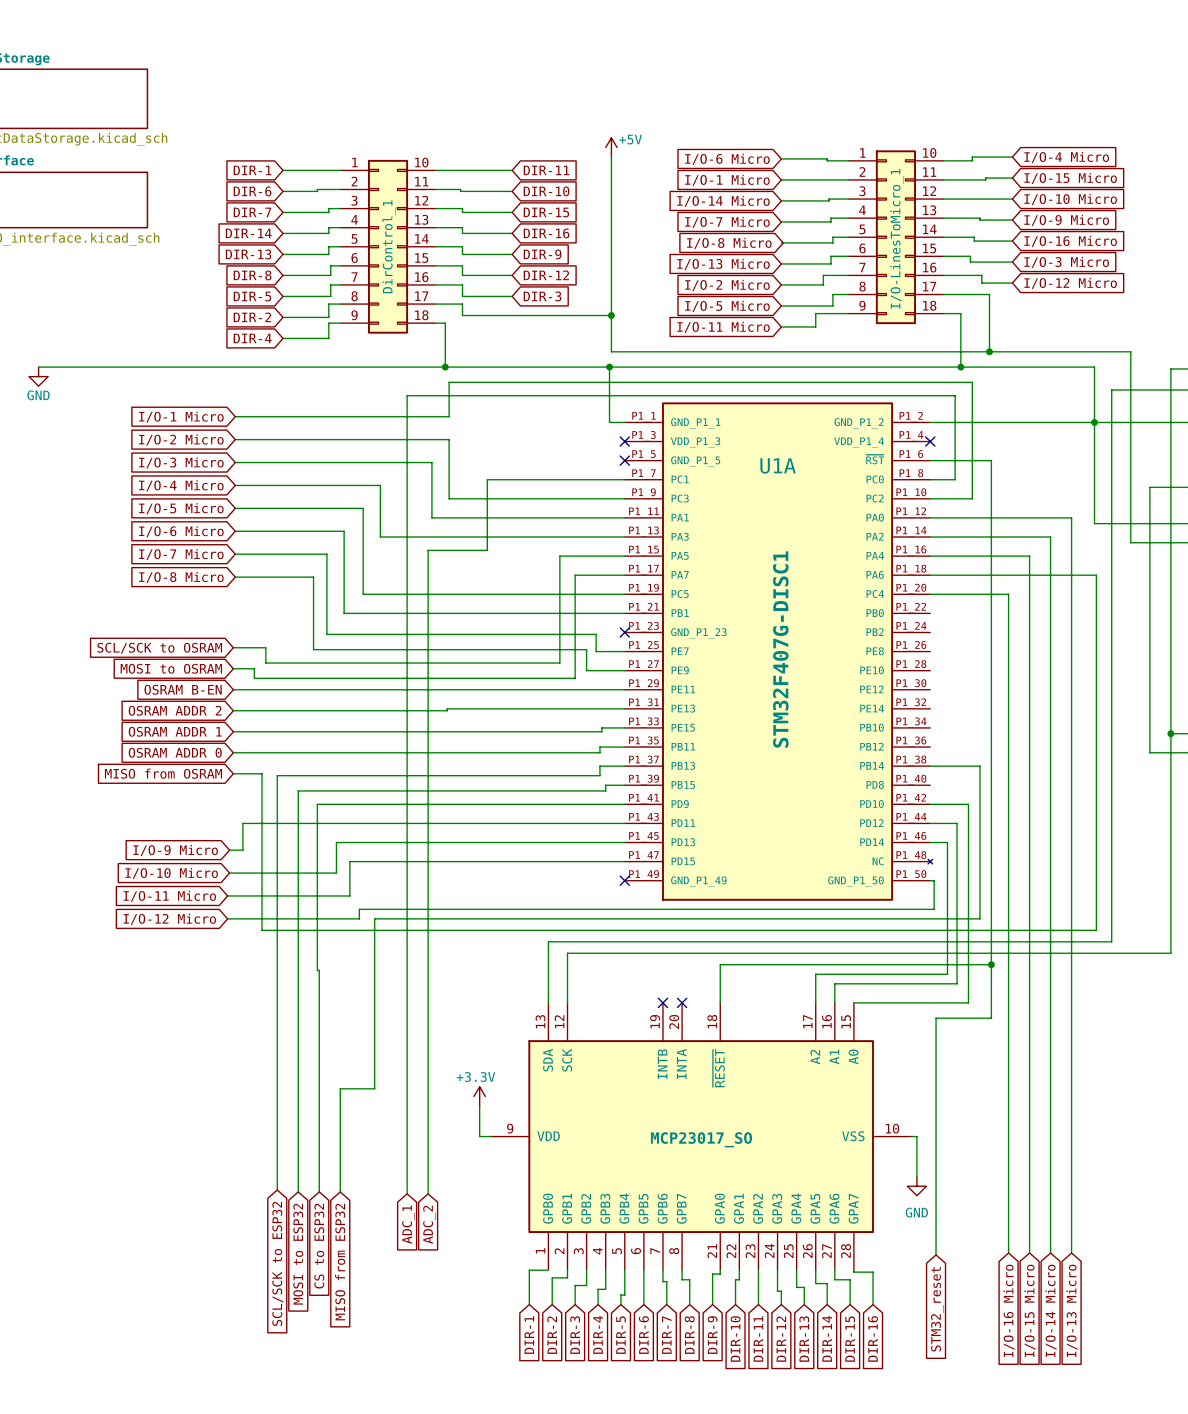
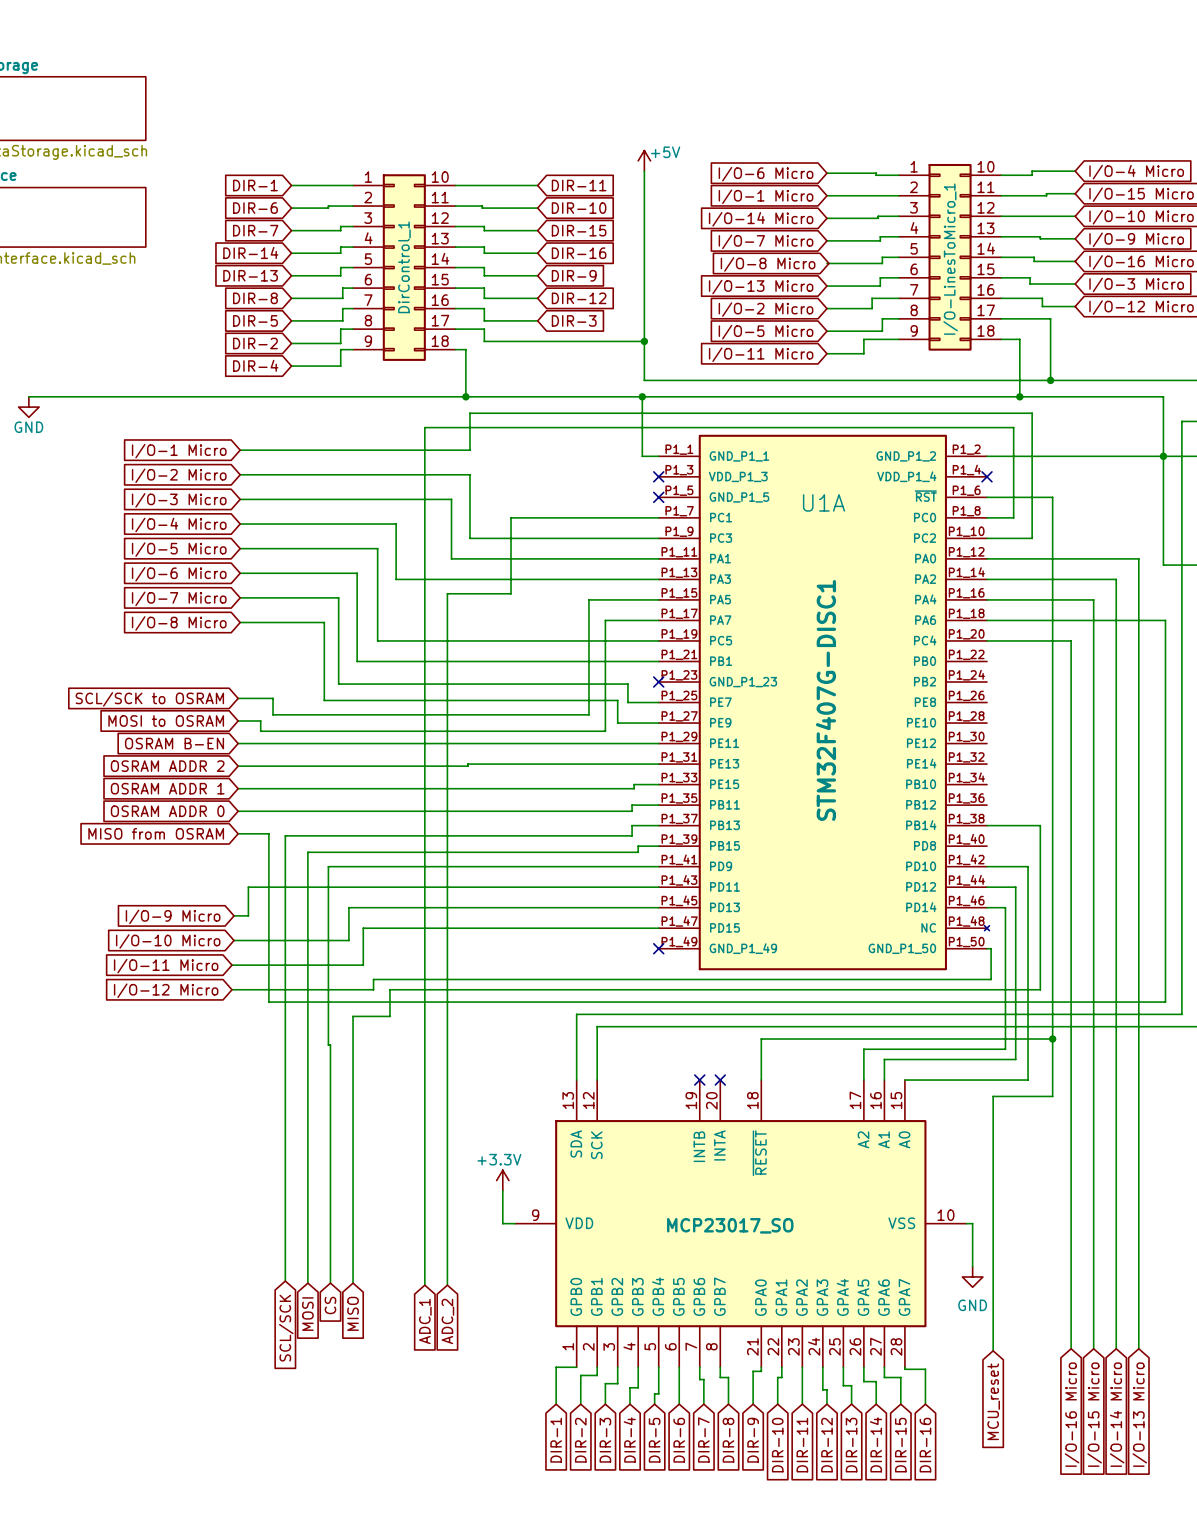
wire: (374, 943) (374, 1088) (340, 1088) -> (389, 1016) (353, 1016) (353, 1172)
global label: CS to ESP32 (319, 1246) -> CS (330, 1305)
global label: MOSI to ESP32 (298, 1254) -> MOSI (307, 1314)
global label: MISO from ESP32 (340, 1262) -> MISO (353, 1313)
global label: SCL/SCK to ESP32 (277, 1263) -> SCL/SCK (286, 1328)
global label: STM32_reset (937, 1309) -> MCU_reset (993, 1401)

